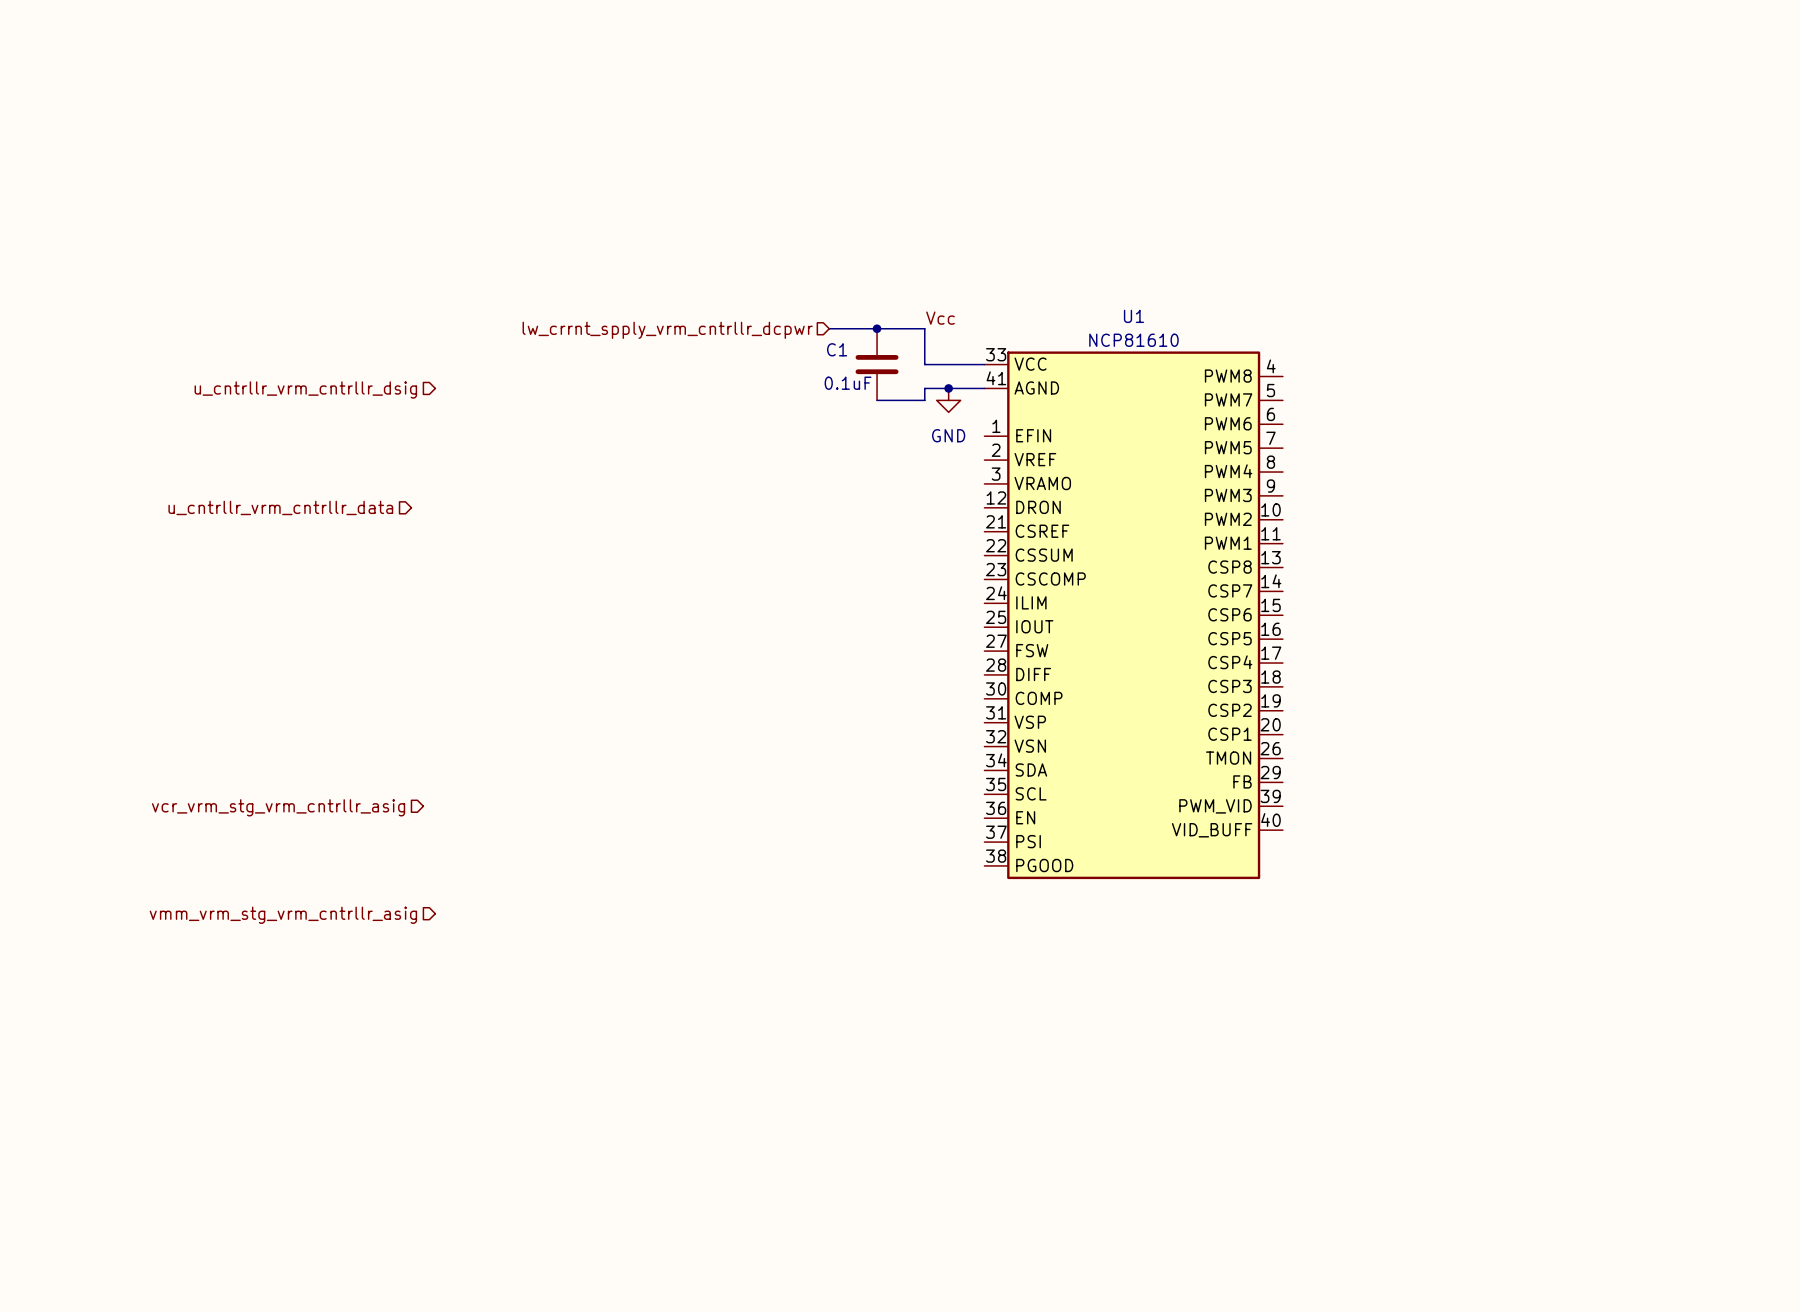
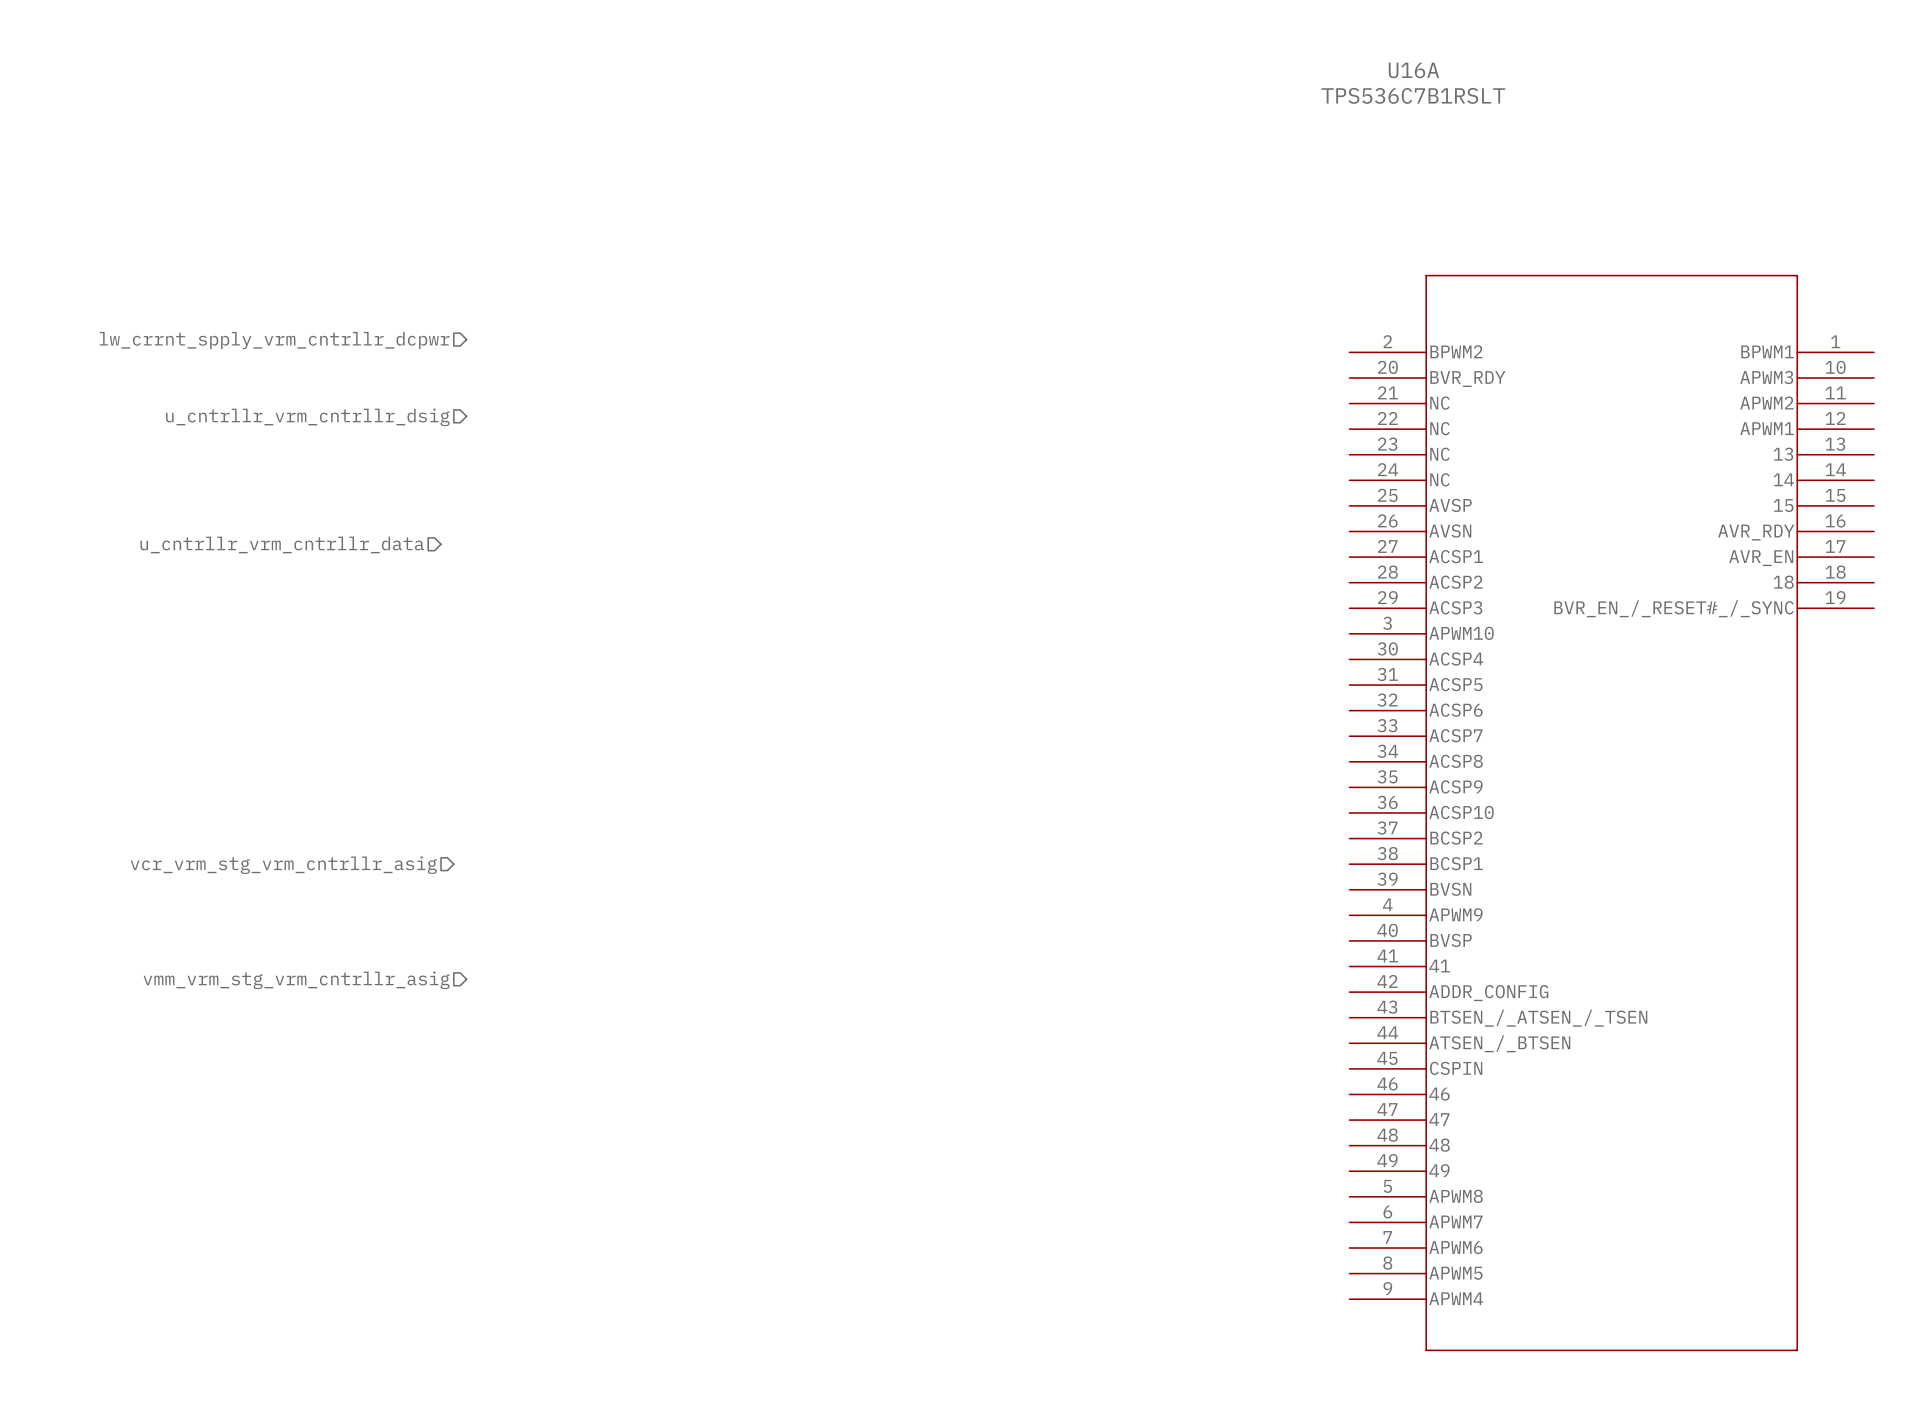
hierarchical label: none -> lw_crrnt_spply_vrm_cntrllr_dcpwr (274, 340)
label: Vcc (940, 318) -> none
wire: (829, 328) (924, 328) (924, 364) (984, 364) -> none
junction: (877, 328) -> none
hierarchical label: lw_crrnt_spply_vrm_cntrllr_dcpwr (667, 330) -> none
C1: 0.1uF (877, 364) -> none
junction: (948, 388) -> none
wire: (984, 388) (924, 388) (924, 400) (877, 400) -> none
power symbol: GND (948, 400) -> none
U1: NCP81610 (1133, 615) -> none
U16A: none -> TPS536C7B1RSLT (1611, 812)

